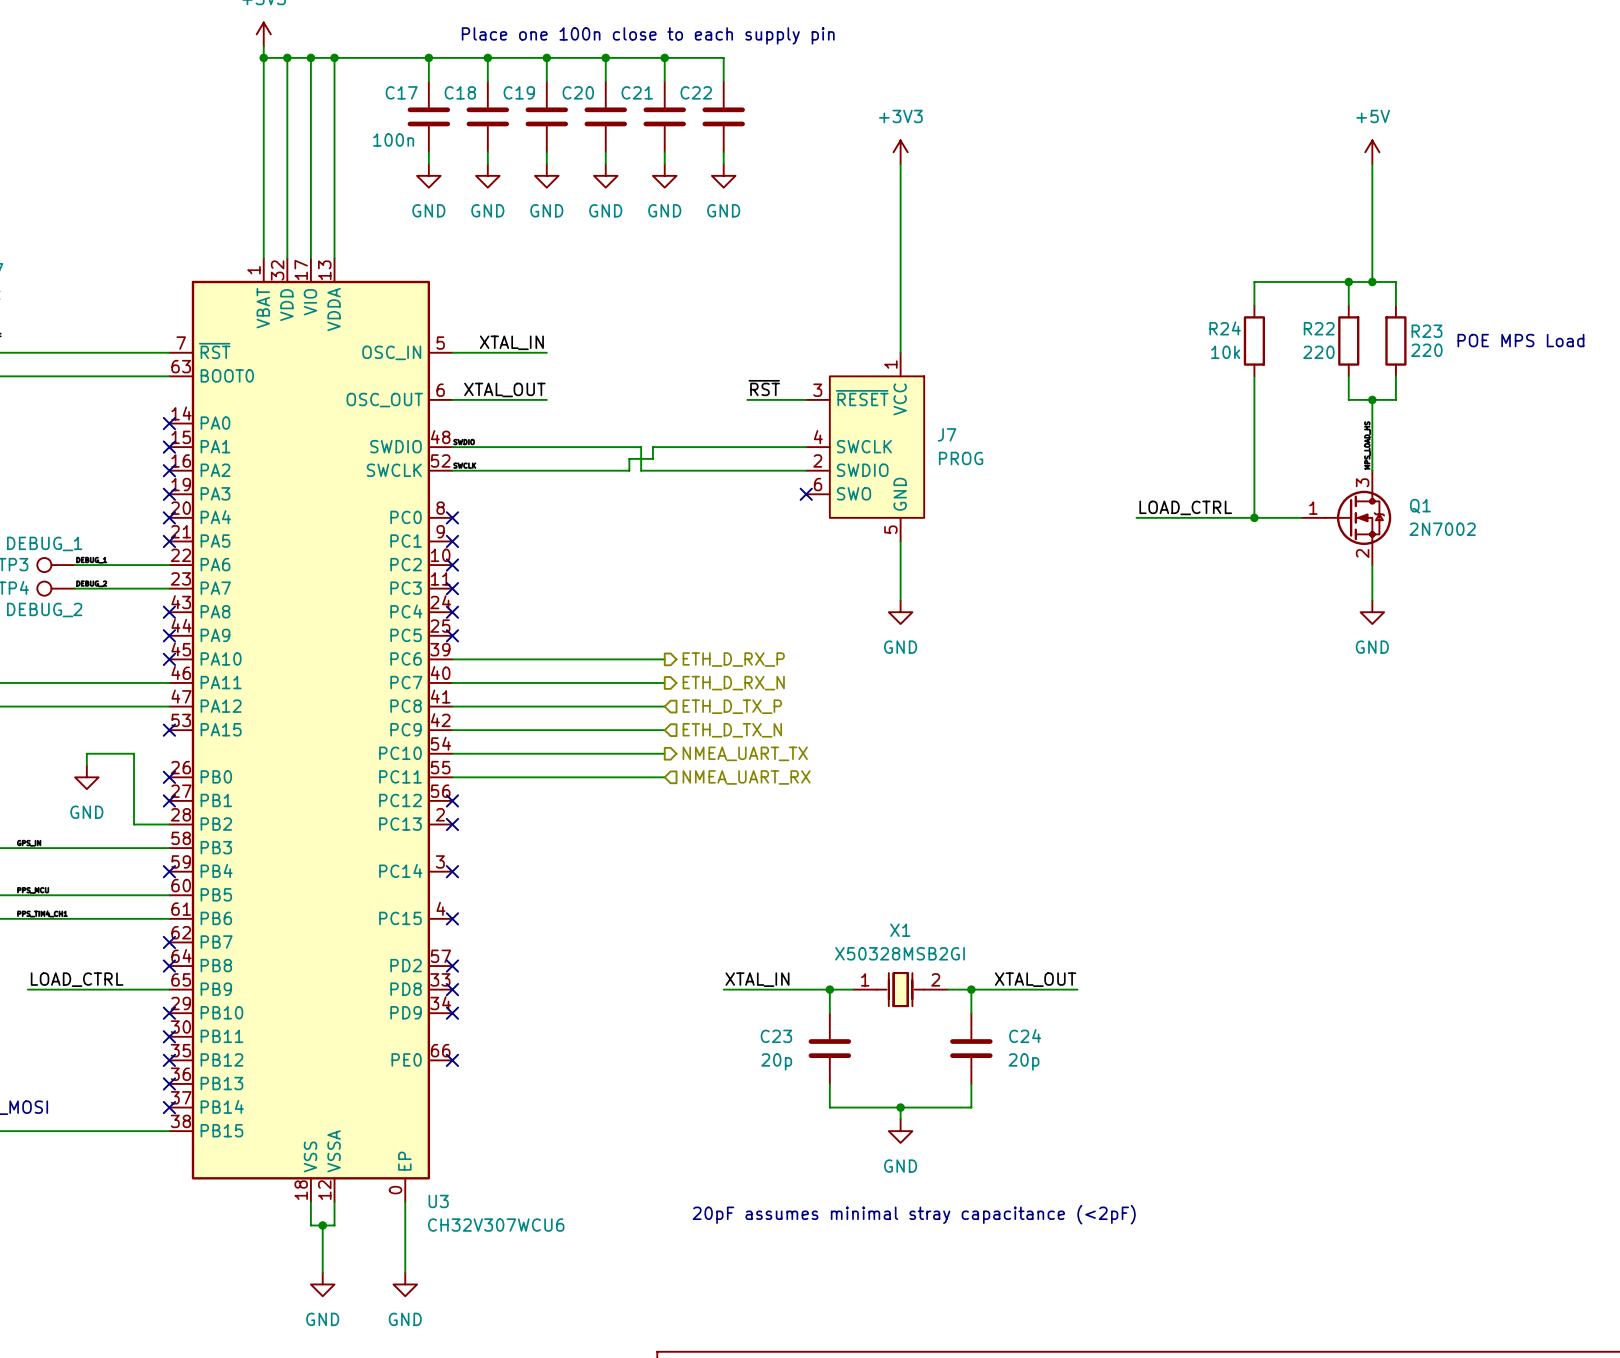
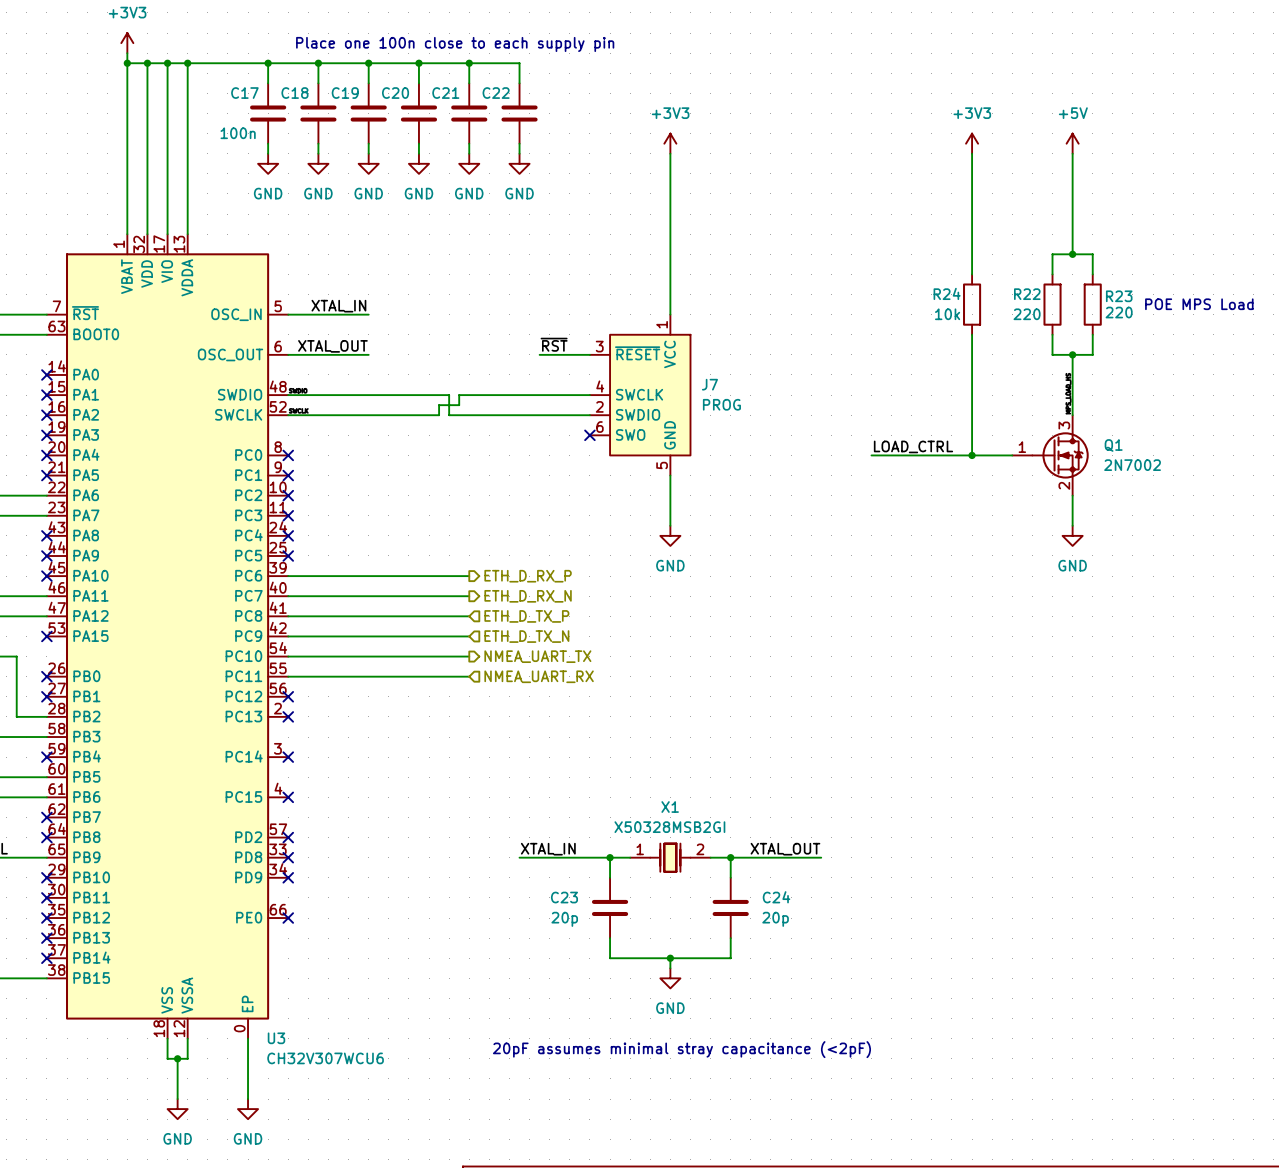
power symbol: none -> +3V3 (972, 143)
wire: (1254, 282) (1348, 282) -> (972, 254) (972, 153)
junction: (1348, 282) -> none

